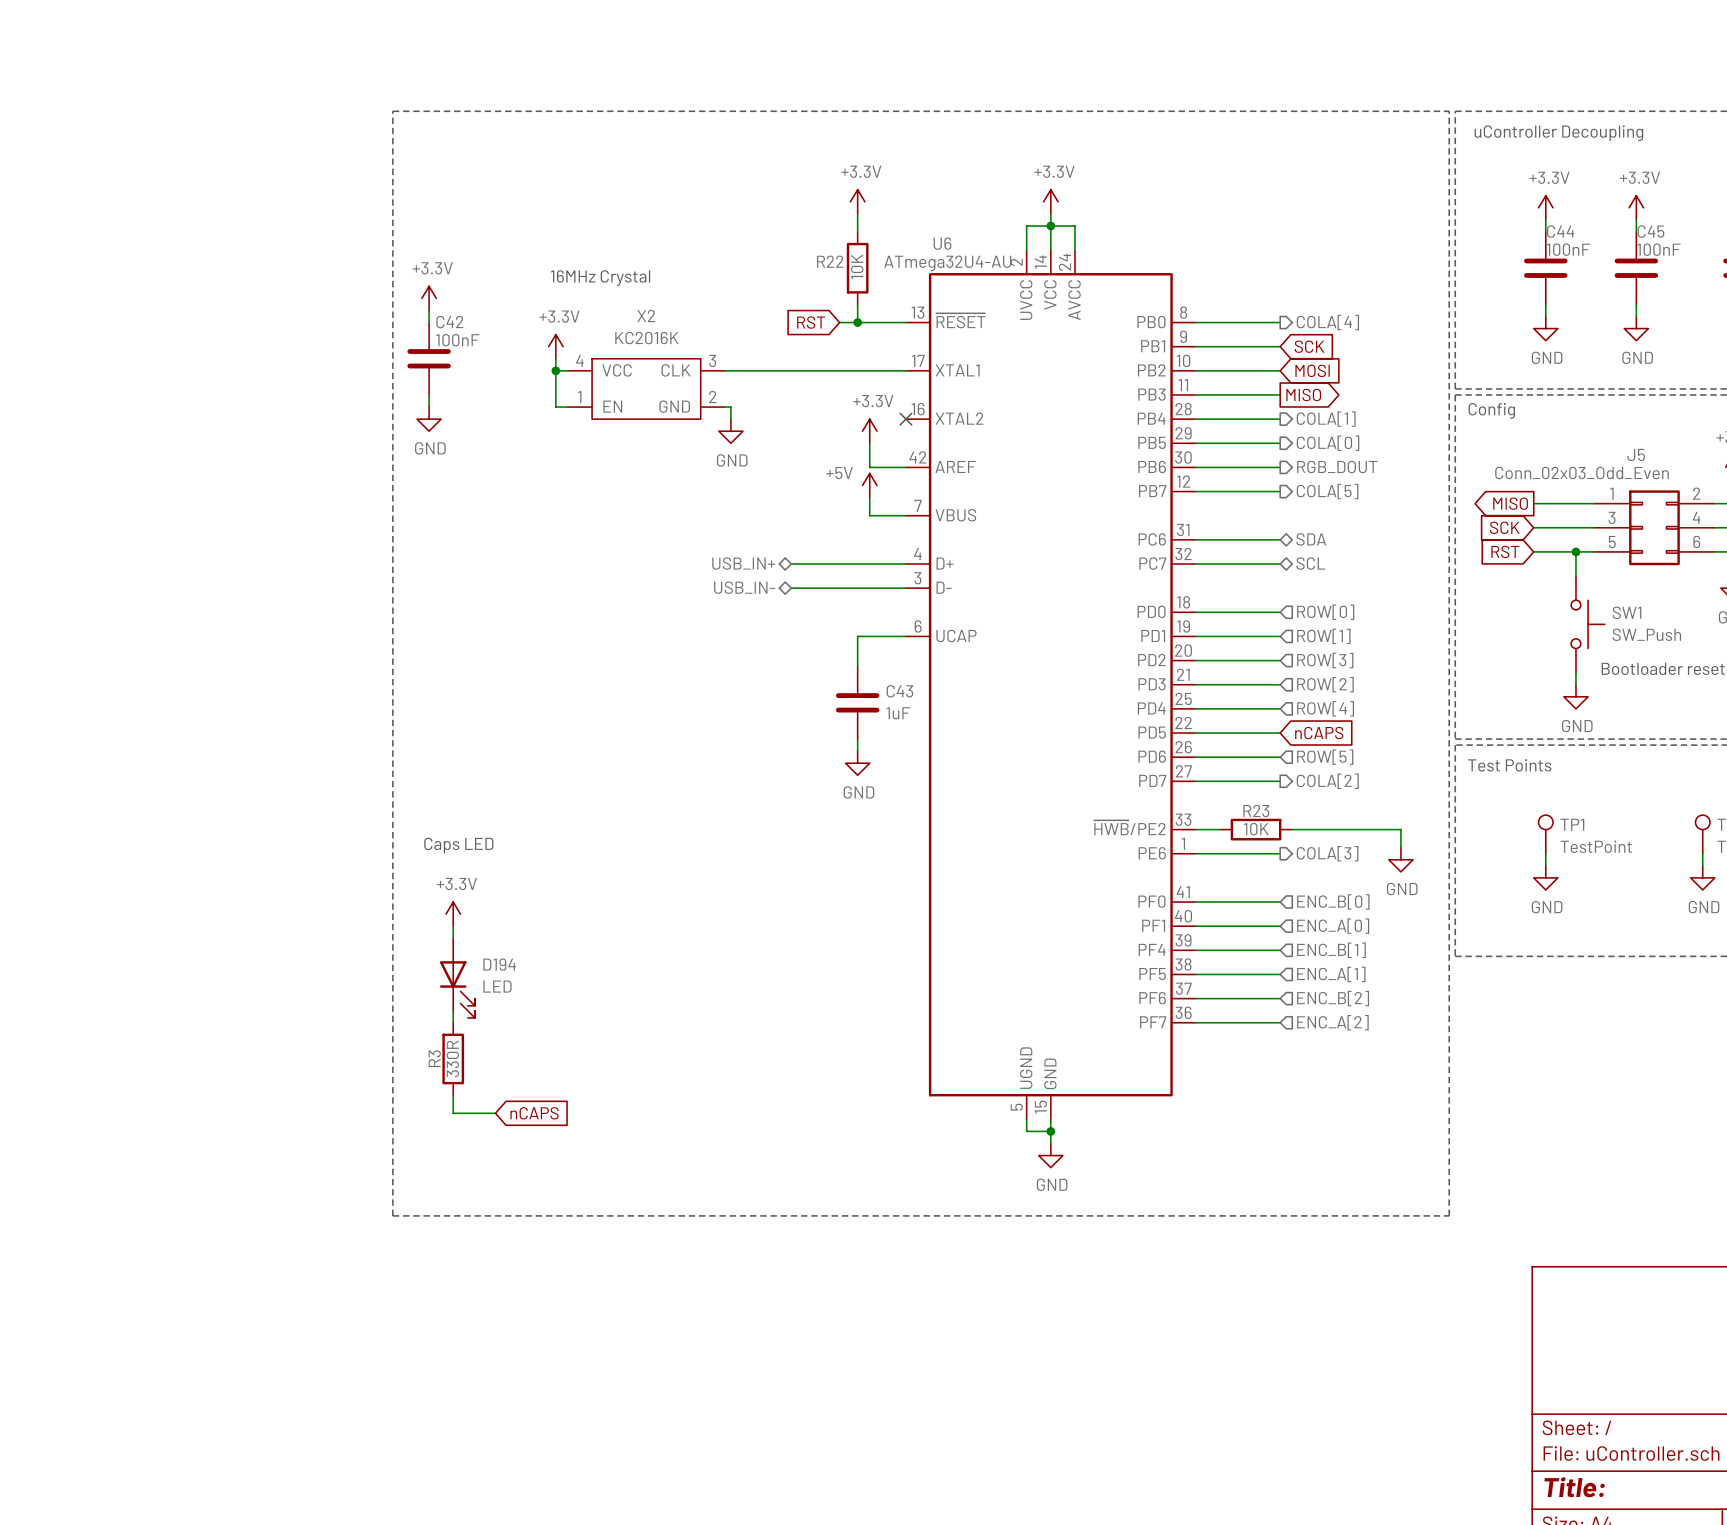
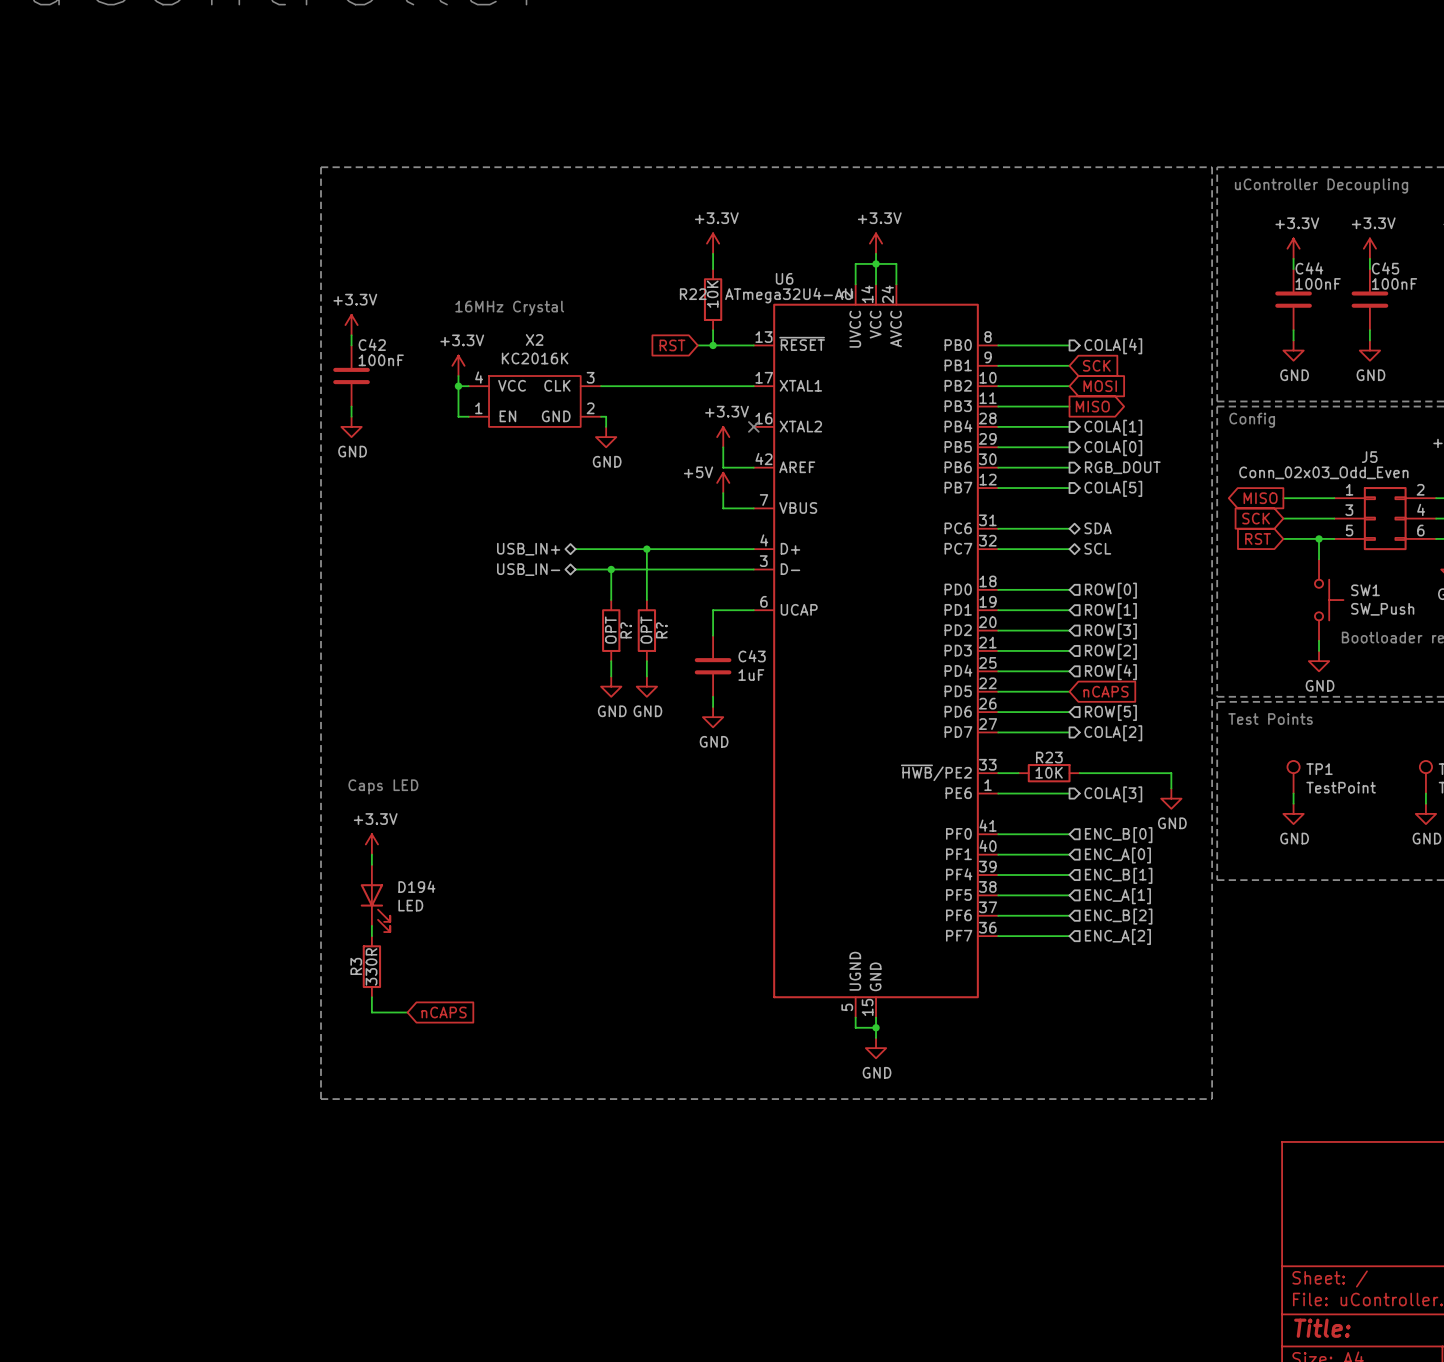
hierarchical label position: USB_IN+ (743, 563) -> USB_IN+ (528, 549)
wire: none -> (575, 549) (657, 549)
wire: none -> (646, 549) (646, 600)
junction: none -> (646, 549)
hierarchical label position: USB_IN- (744, 587) -> USB_IN- (528, 569)
wire: none -> (575, 569) (657, 569)
wire: none -> (611, 569) (611, 600)
junction: none -> (611, 569)
R?: none -> OPT (611, 630)
R?: none -> OPT (646, 630)
wire: none -> (611, 661) (611, 676)
wire: none -> (646, 661) (646, 676)
power symbol: none -> GND (611, 686)
power symbol: none -> GND (646, 686)

